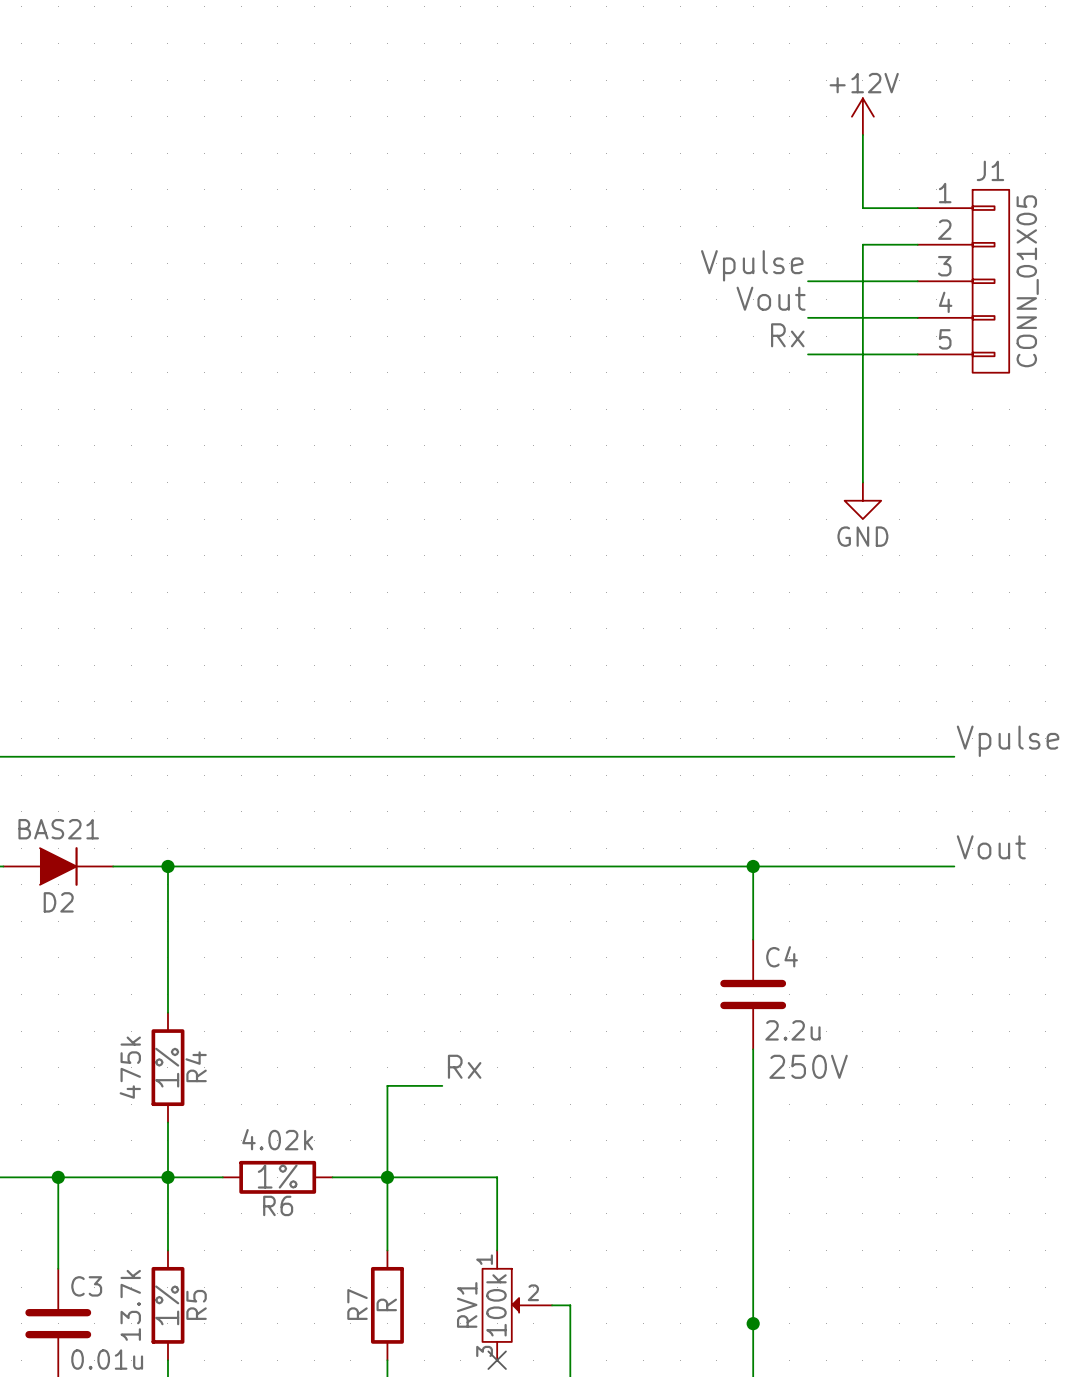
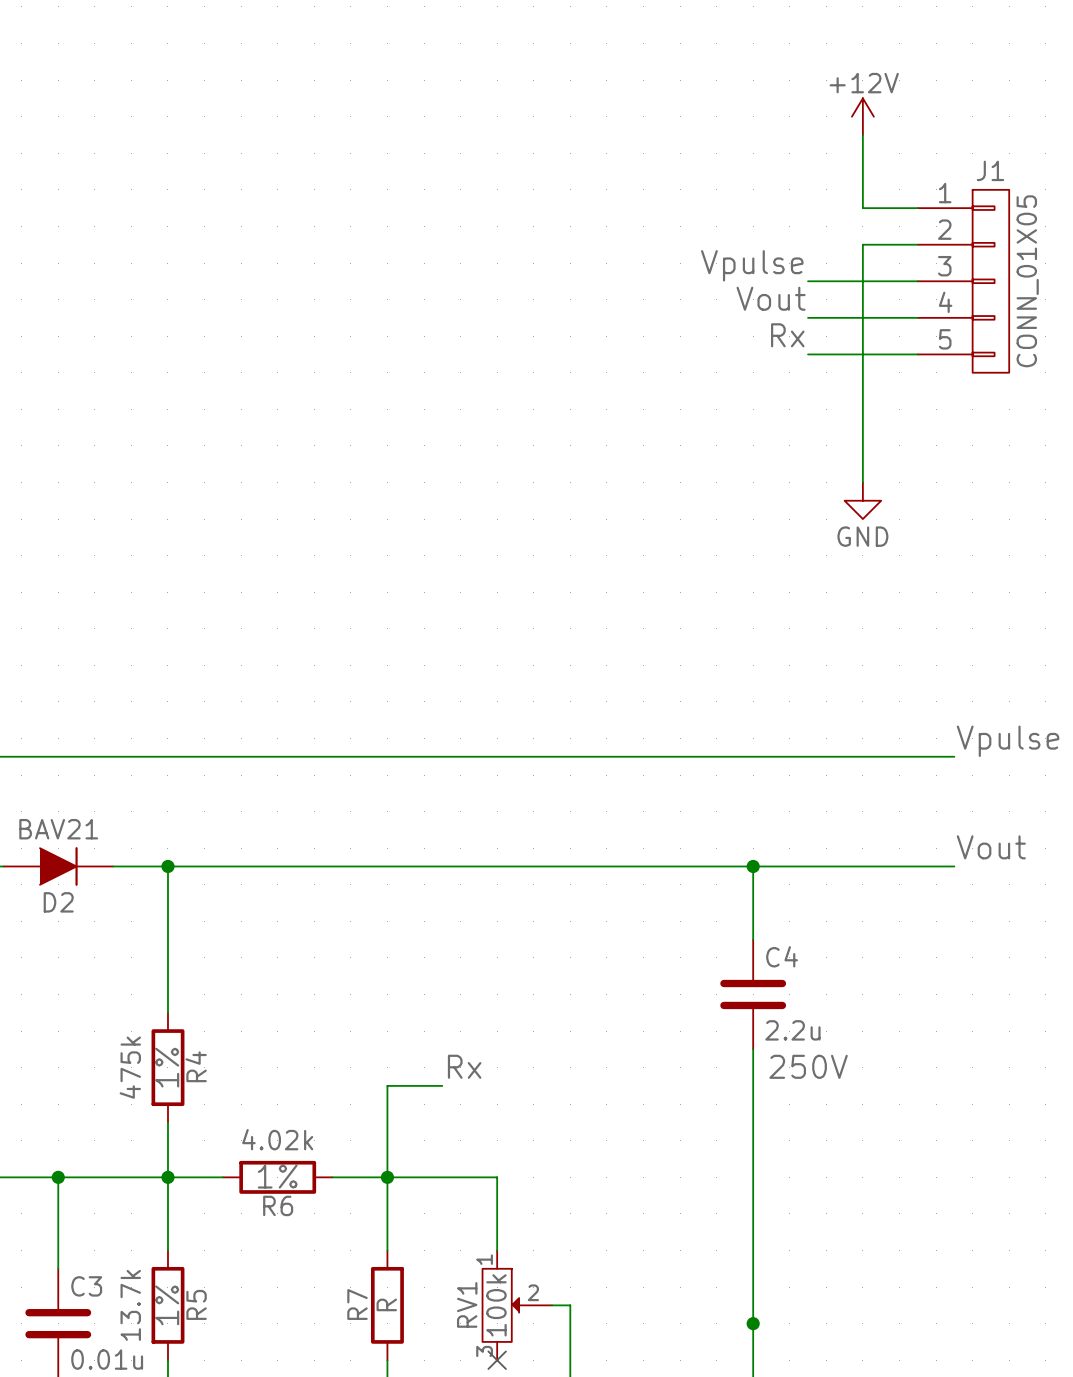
D2 value: BAS21 (58, 829) -> BAV21 (58, 829)

